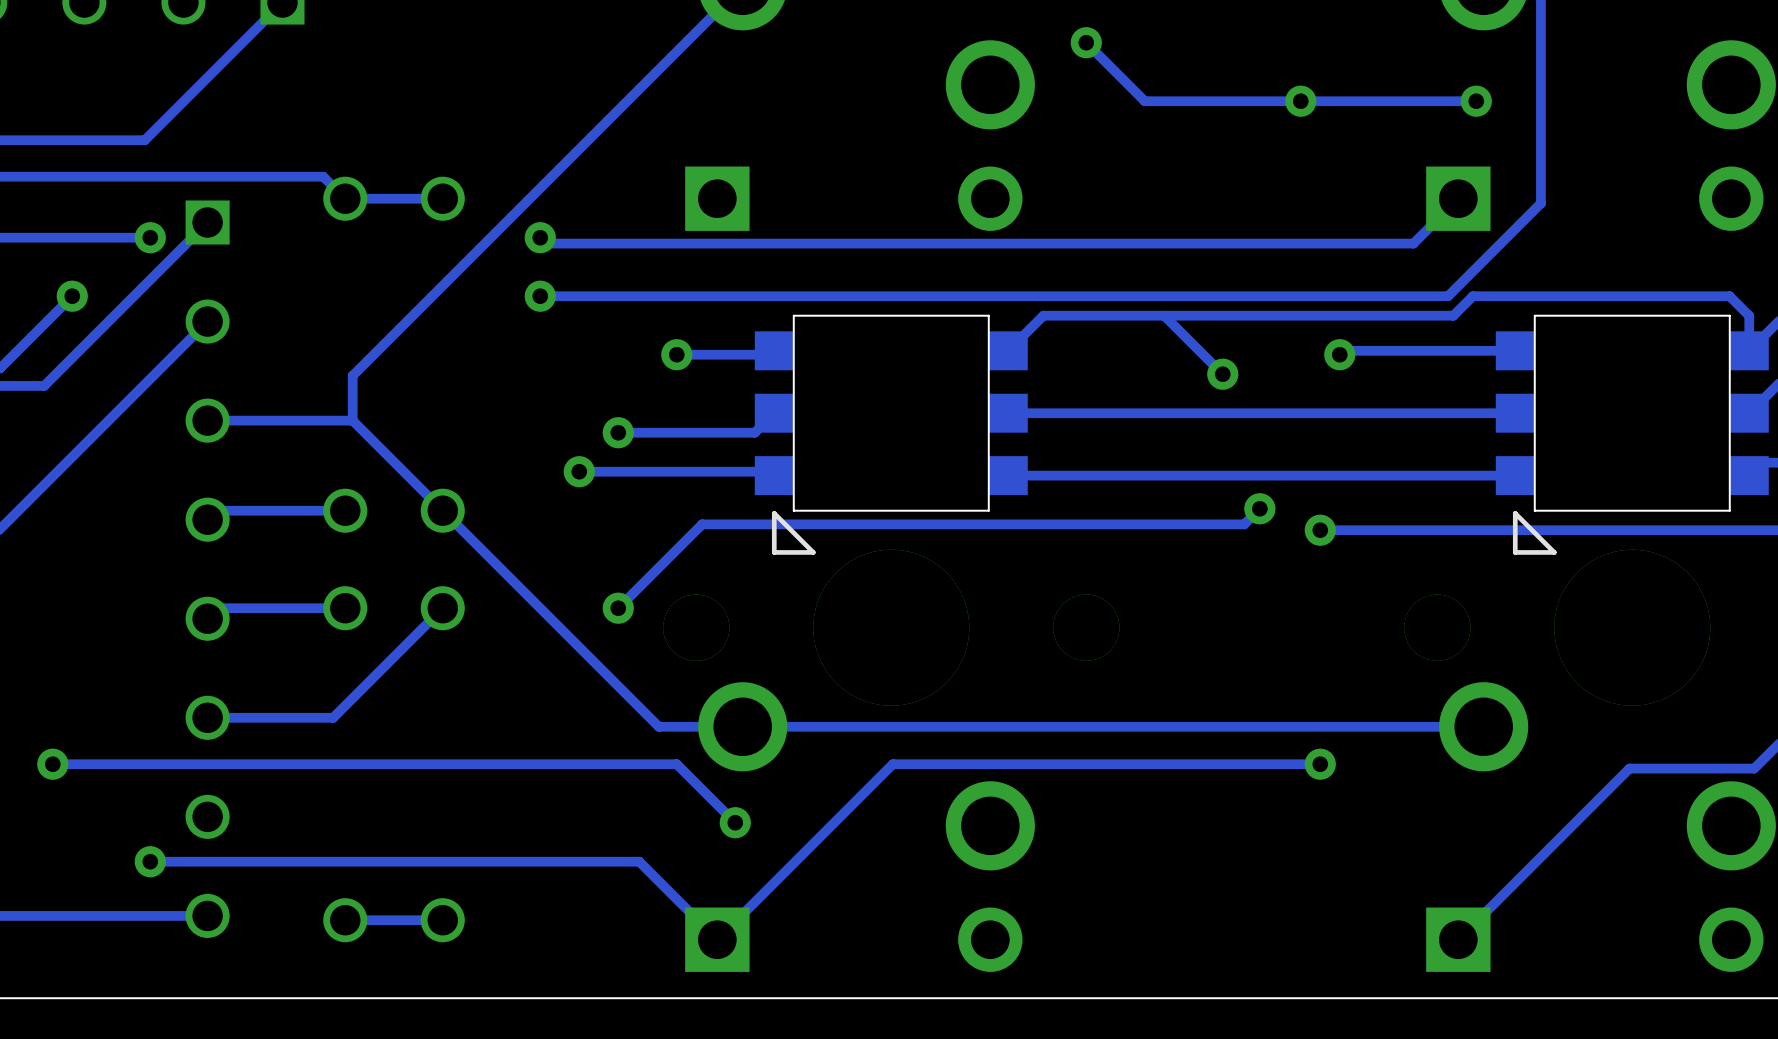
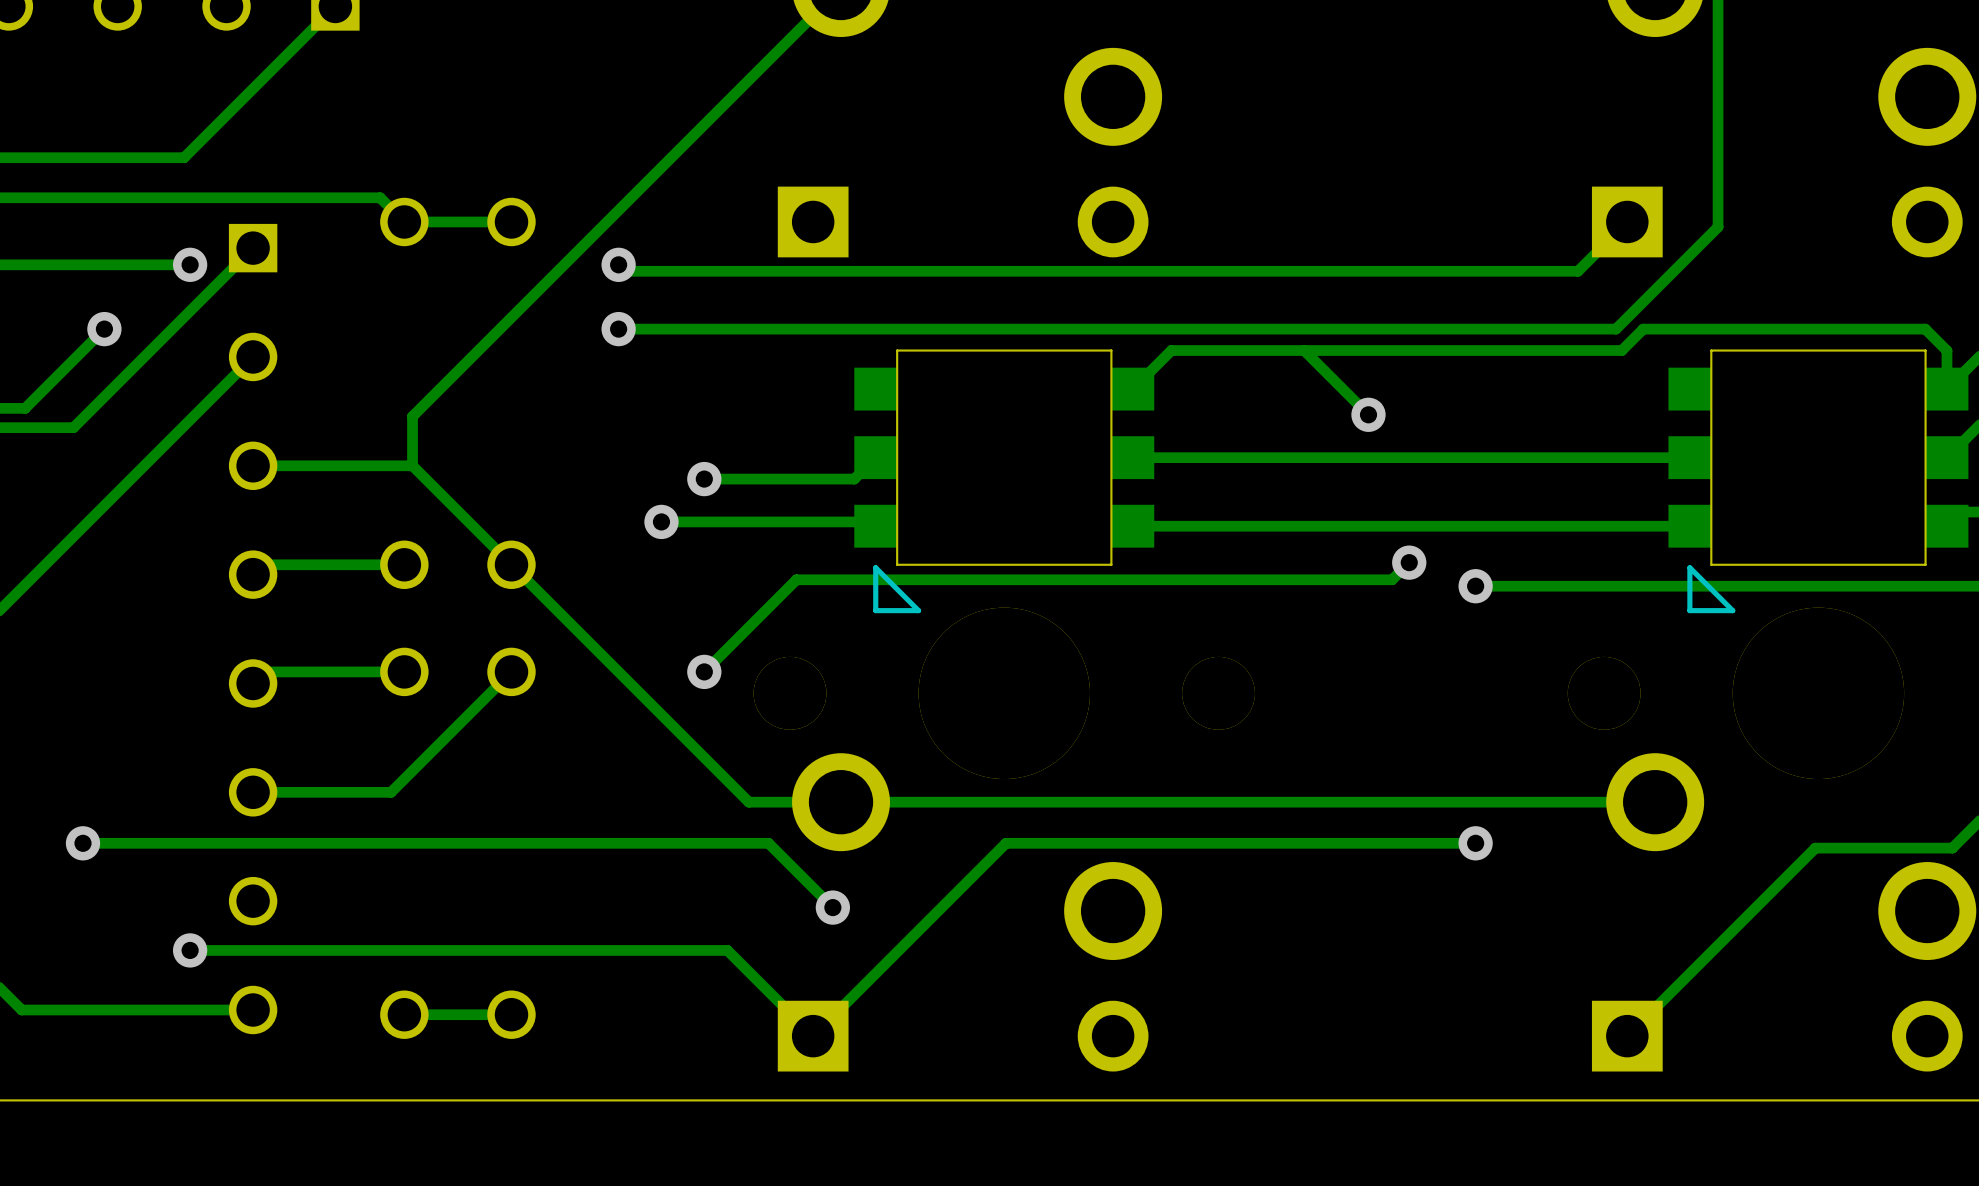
track: (1086, 42) (1144, 101) (1476, 101) -> none
via: (1086, 42) -> none
via: (1300, 101) -> none
via: (1476, 101) -> none
track: (774, 350) (770, 354) (676, 354) -> none
track: (1515, 350) (1343, 350) (1339, 354) -> none
via: (676, 354) -> none
via: (1339, 354) -> none

